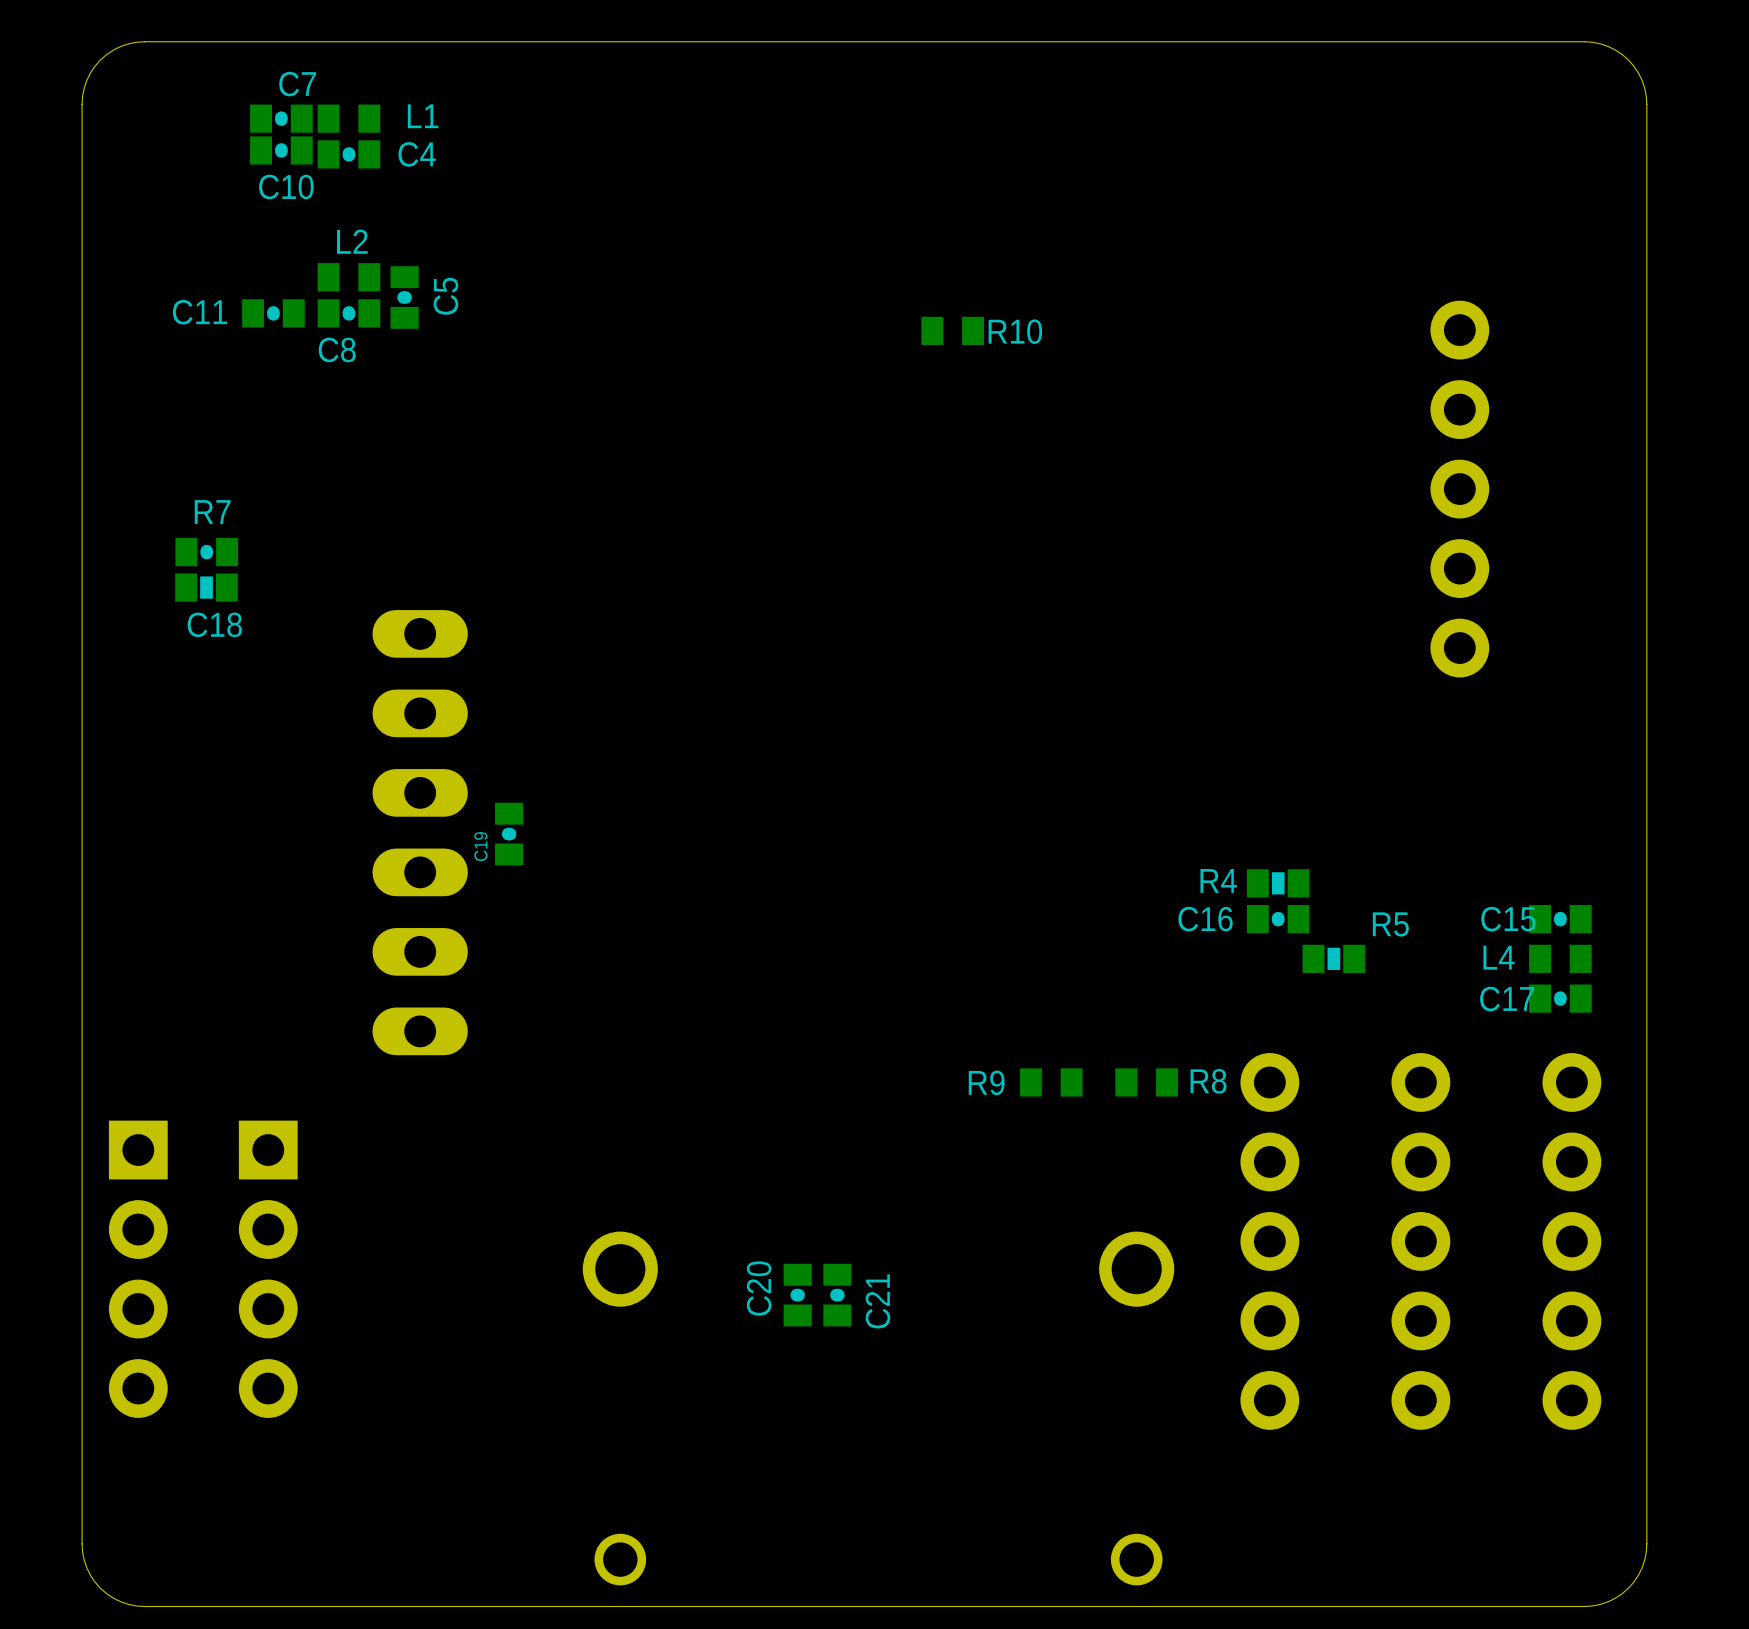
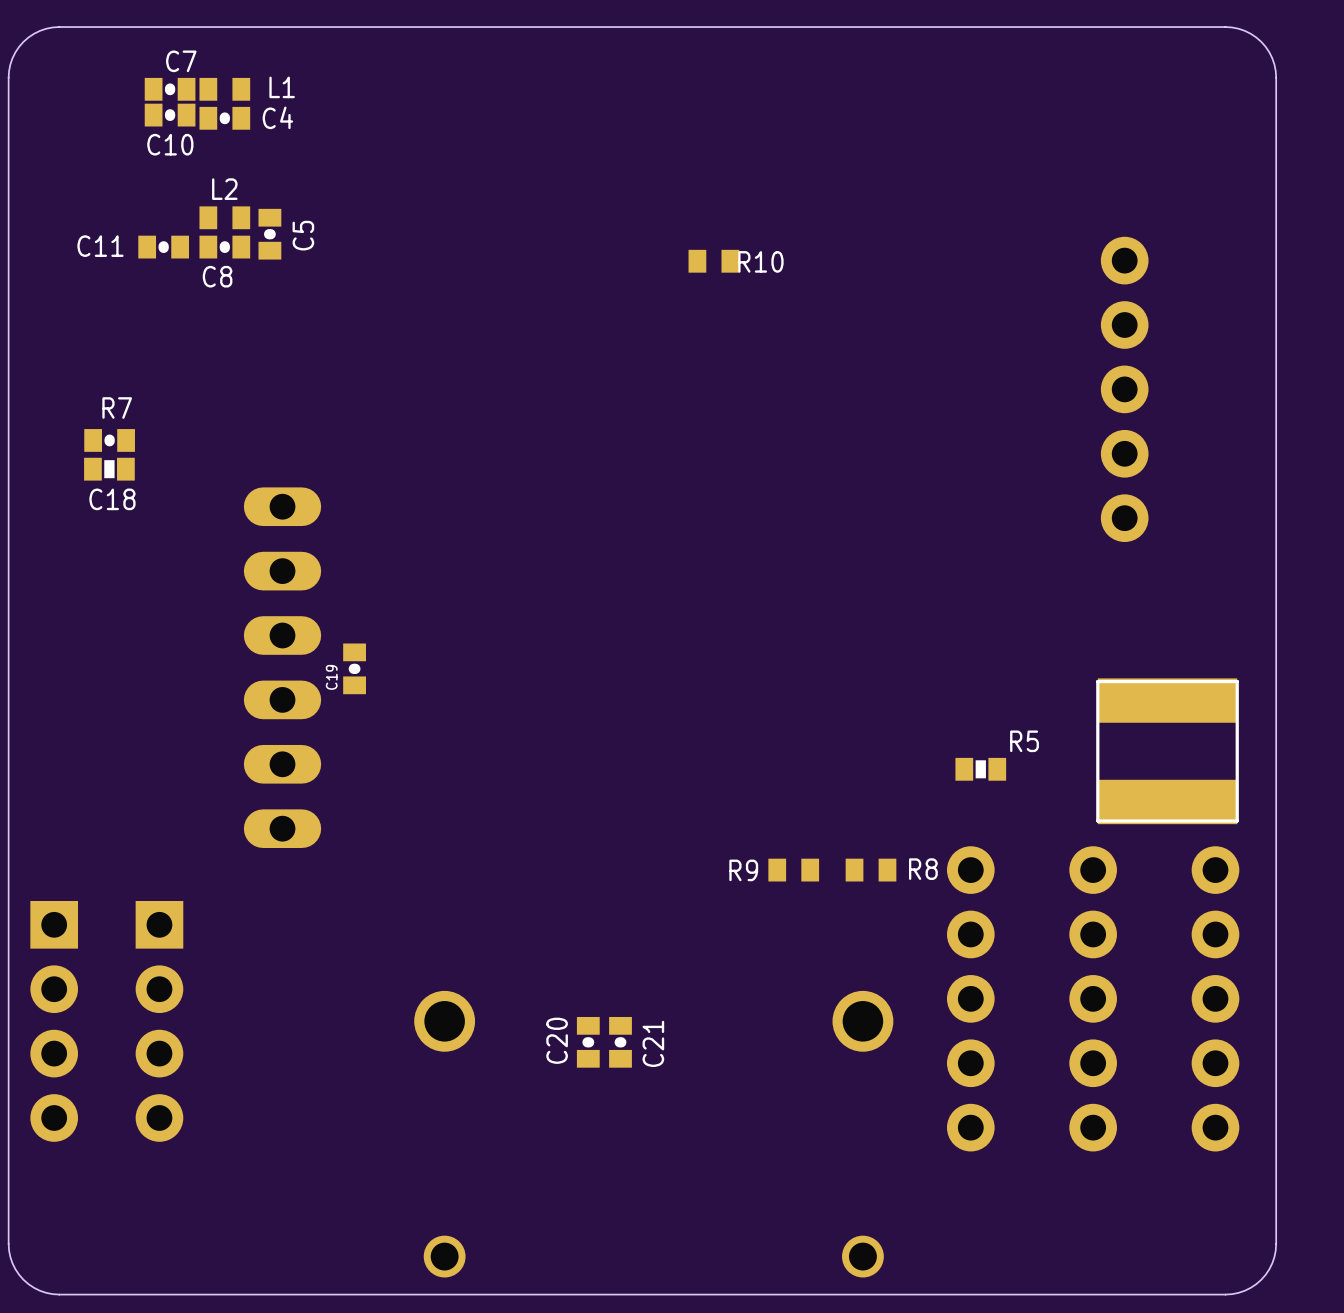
R4: (1278, 883) -> none
C16: (1278, 919) -> none
C15: (1560, 919) -> none
part: none -> (1167, 751)
R5 position: (1333, 958) -> (980, 769)
L4: (1560, 958) -> none
C17: (1560, 998) -> none

